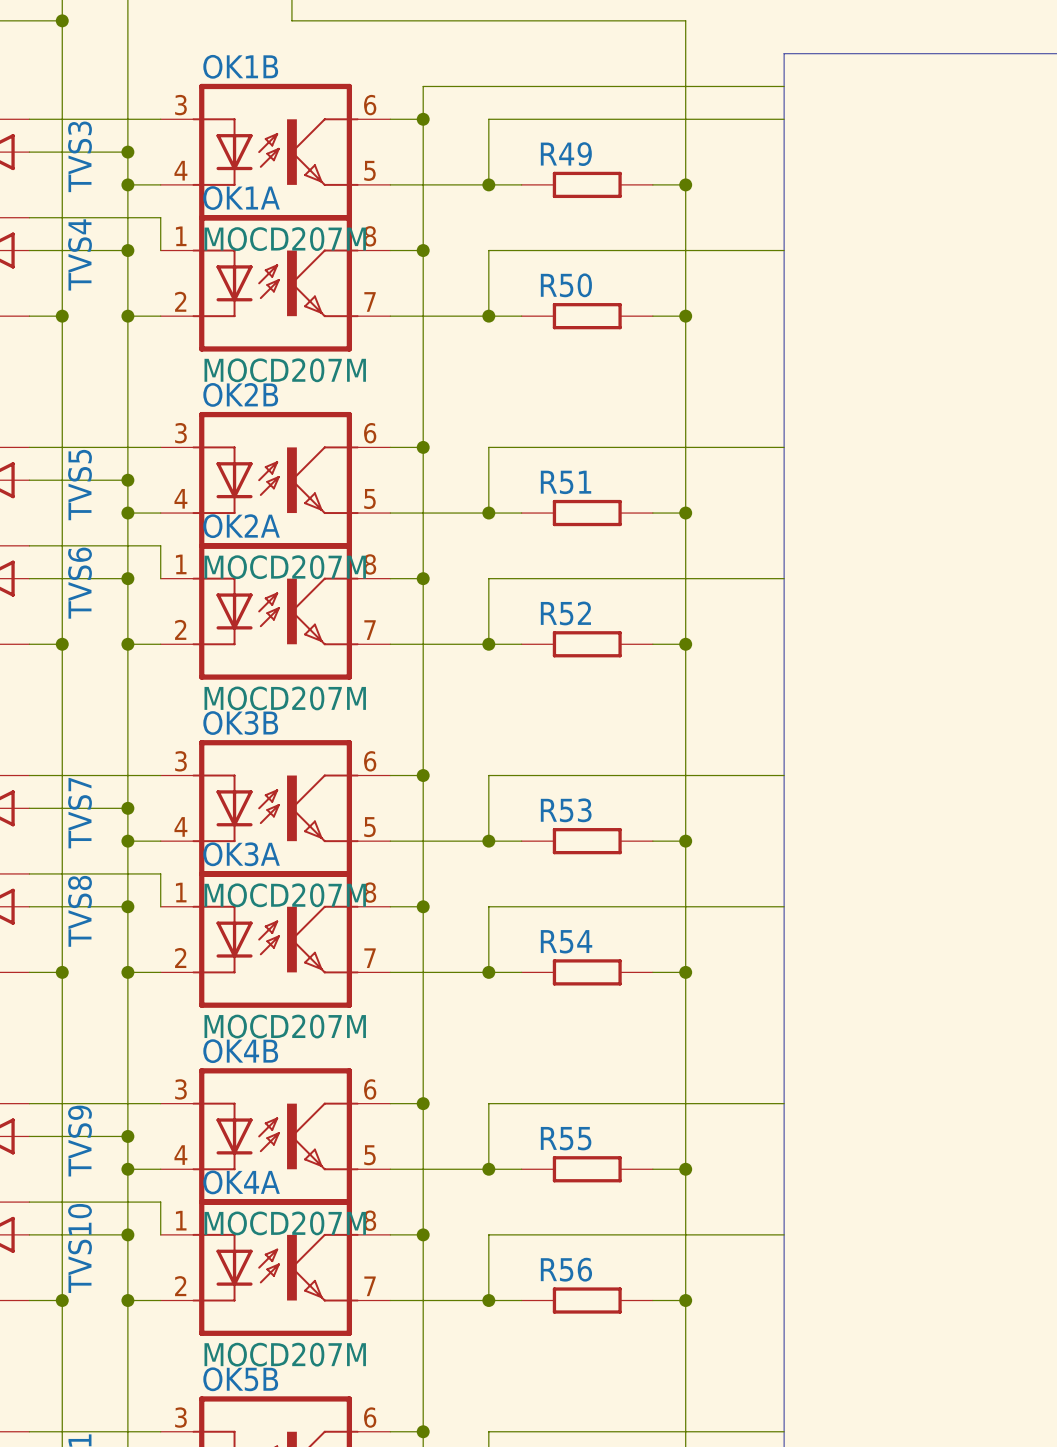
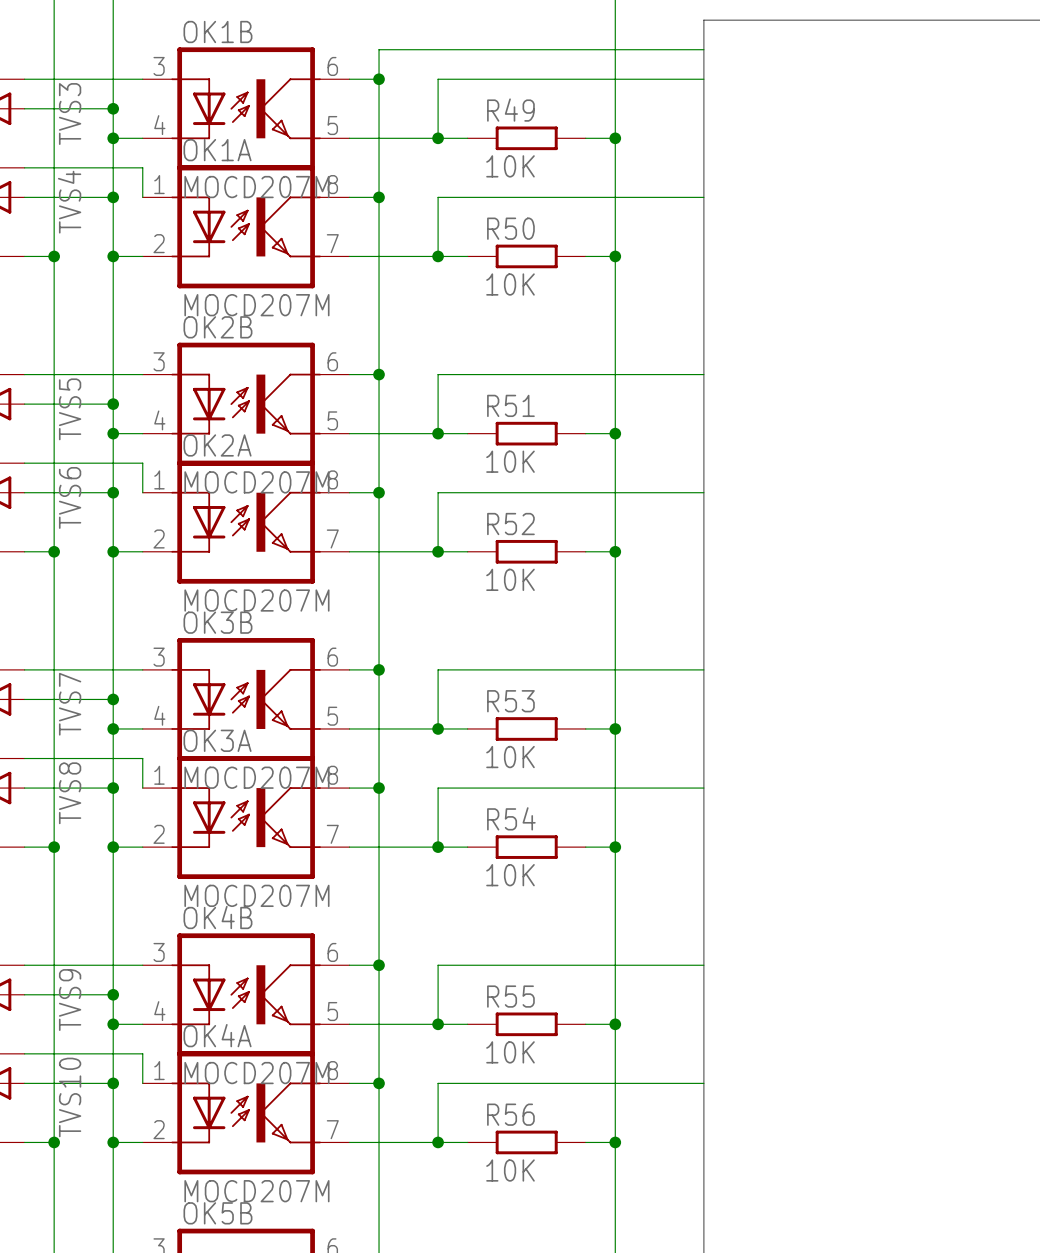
R49 value: none -> 10K (510, 166)
R50 value: none -> 10K (510, 284)
R51 value: none -> 10K (510, 461)
R52 value: none -> 10K (510, 579)
R53 value: none -> 10K (510, 757)
R54 value: none -> 10K (510, 875)
R55 value: none -> 10K (510, 1052)
R56 value: none -> 10K (510, 1170)

